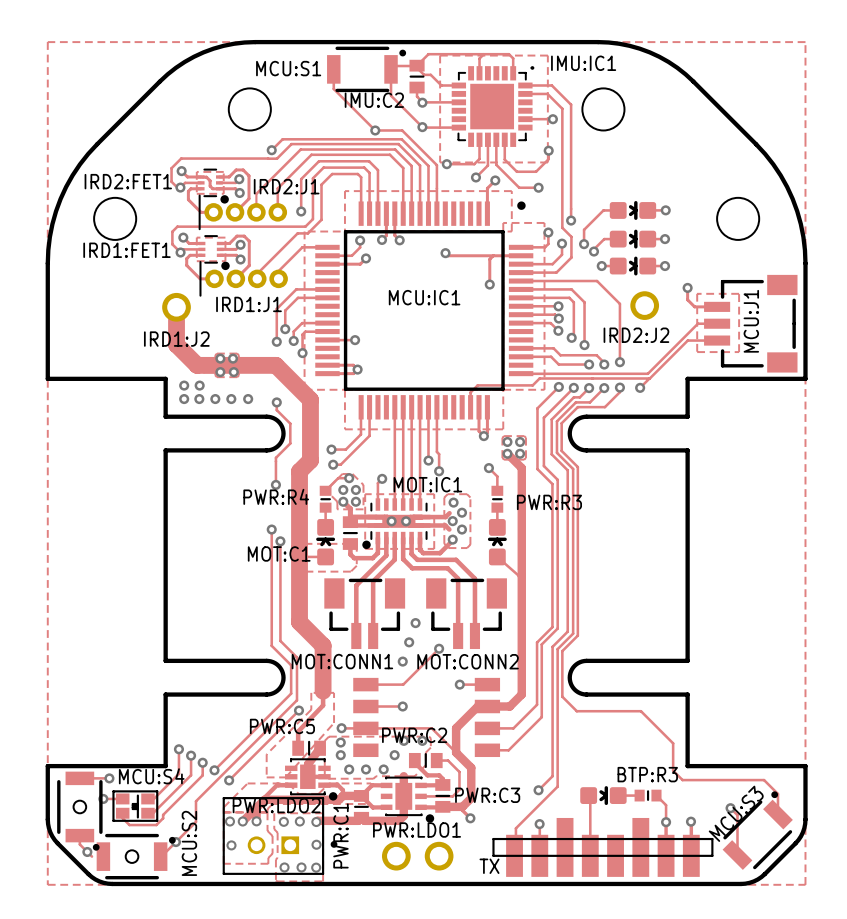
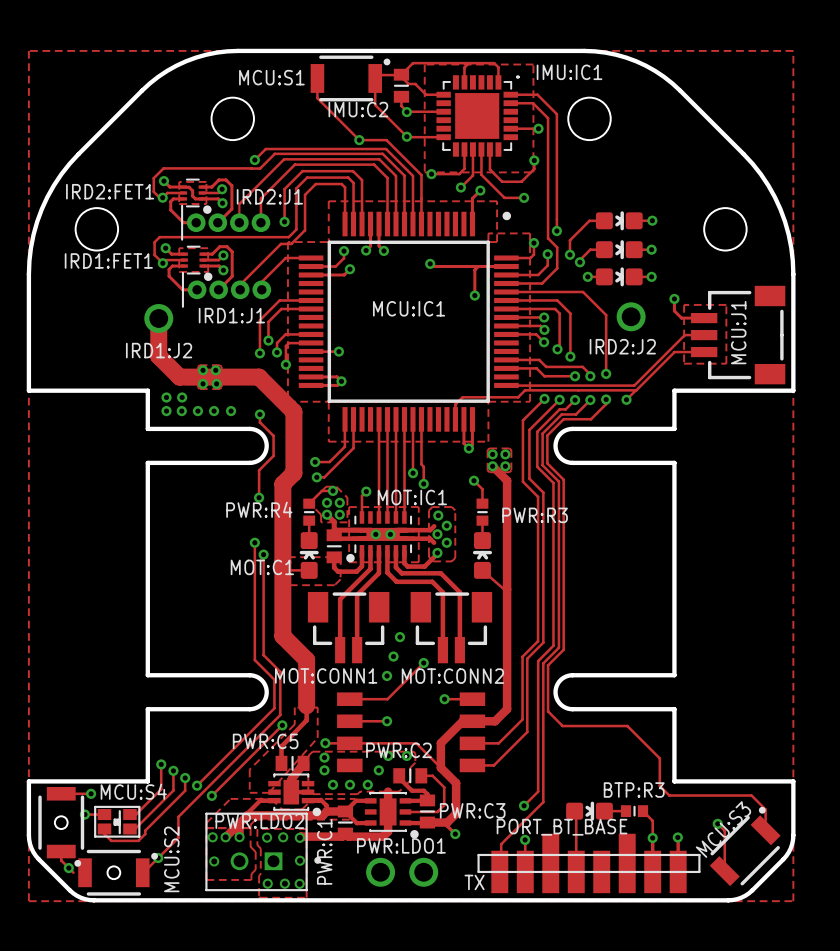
part value: none -> PORT_BT_BASE (562, 827)

